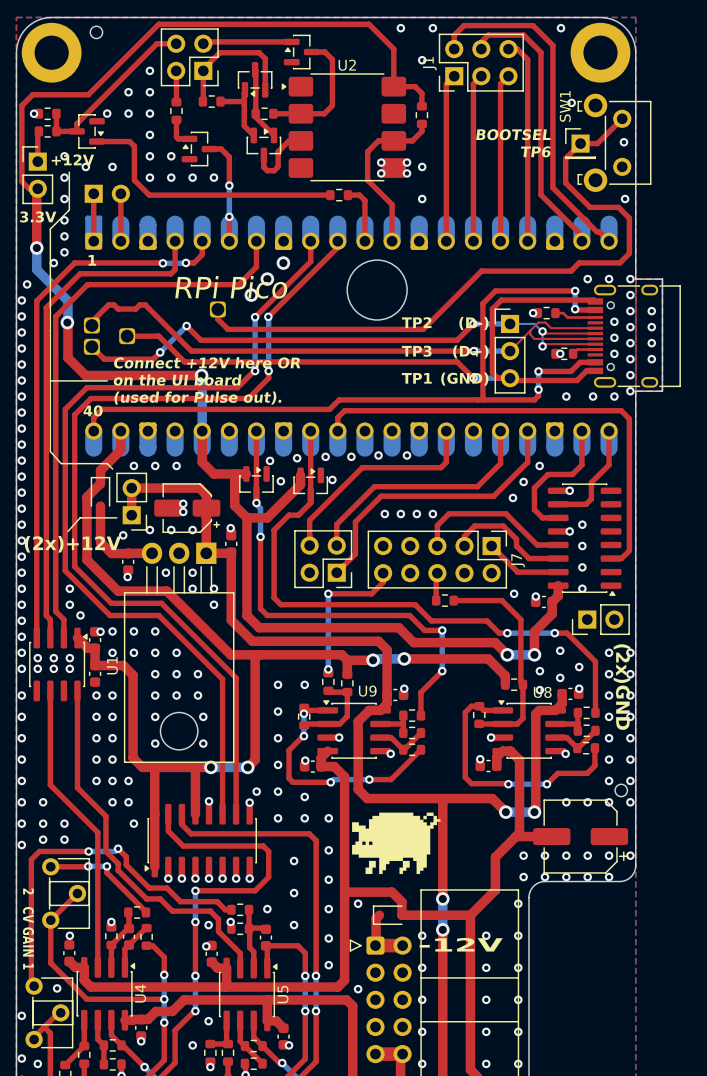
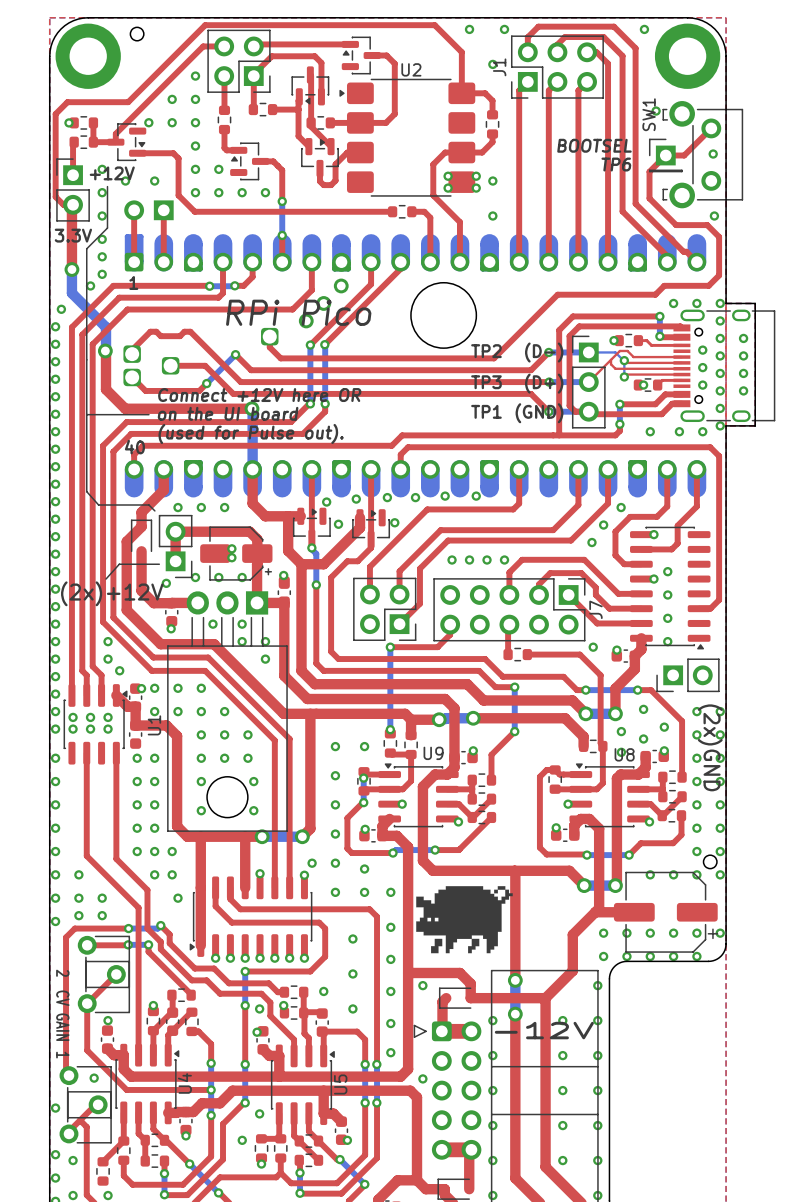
part rotation: 0° (107, 193) -> 180° (148, 210)

